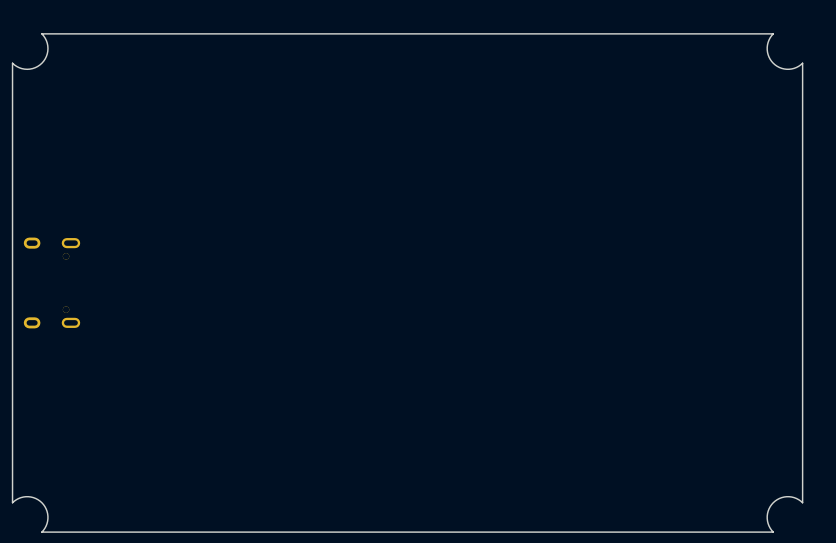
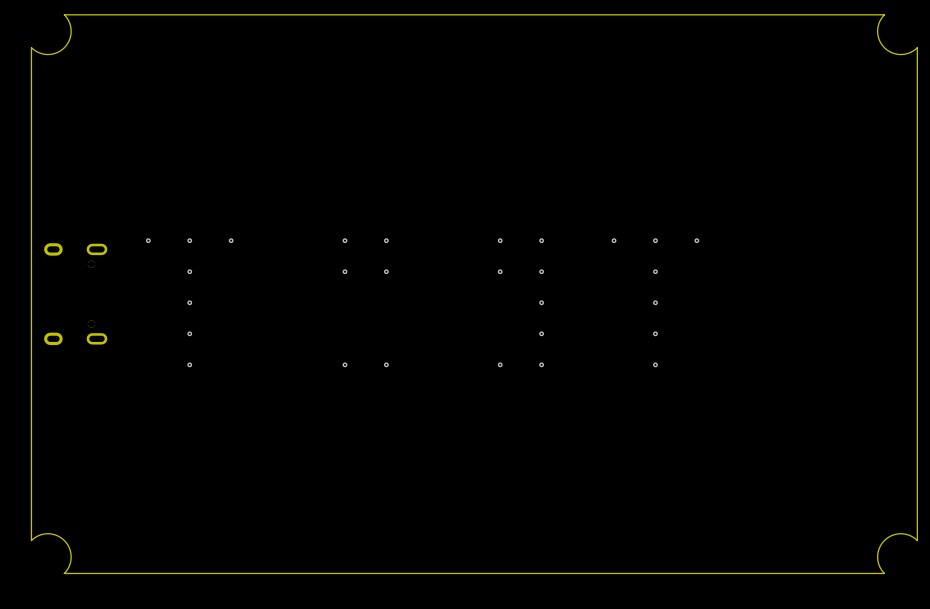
via: none -> (148, 240)
via: none -> (189, 240)
via: none -> (231, 240)
via: none -> (344, 240)
via: none -> (386, 240)
via: none -> (500, 240)
via: none -> (541, 240)
via: none -> (614, 240)
via: none -> (655, 240)
via: none -> (696, 240)
via: none -> (189, 271)
via: none -> (344, 271)
via: none -> (386, 271)
via: none -> (500, 271)
via: none -> (541, 271)
via: none -> (655, 271)
via: none -> (189, 302)
via: none -> (541, 302)
via: none -> (655, 302)
via: none -> (189, 333)
via: none -> (541, 333)
via: none -> (655, 333)
via: none -> (189, 364)
via: none -> (344, 364)
via: none -> (386, 364)
via: none -> (500, 364)
via: none -> (541, 364)
via: none -> (655, 364)

